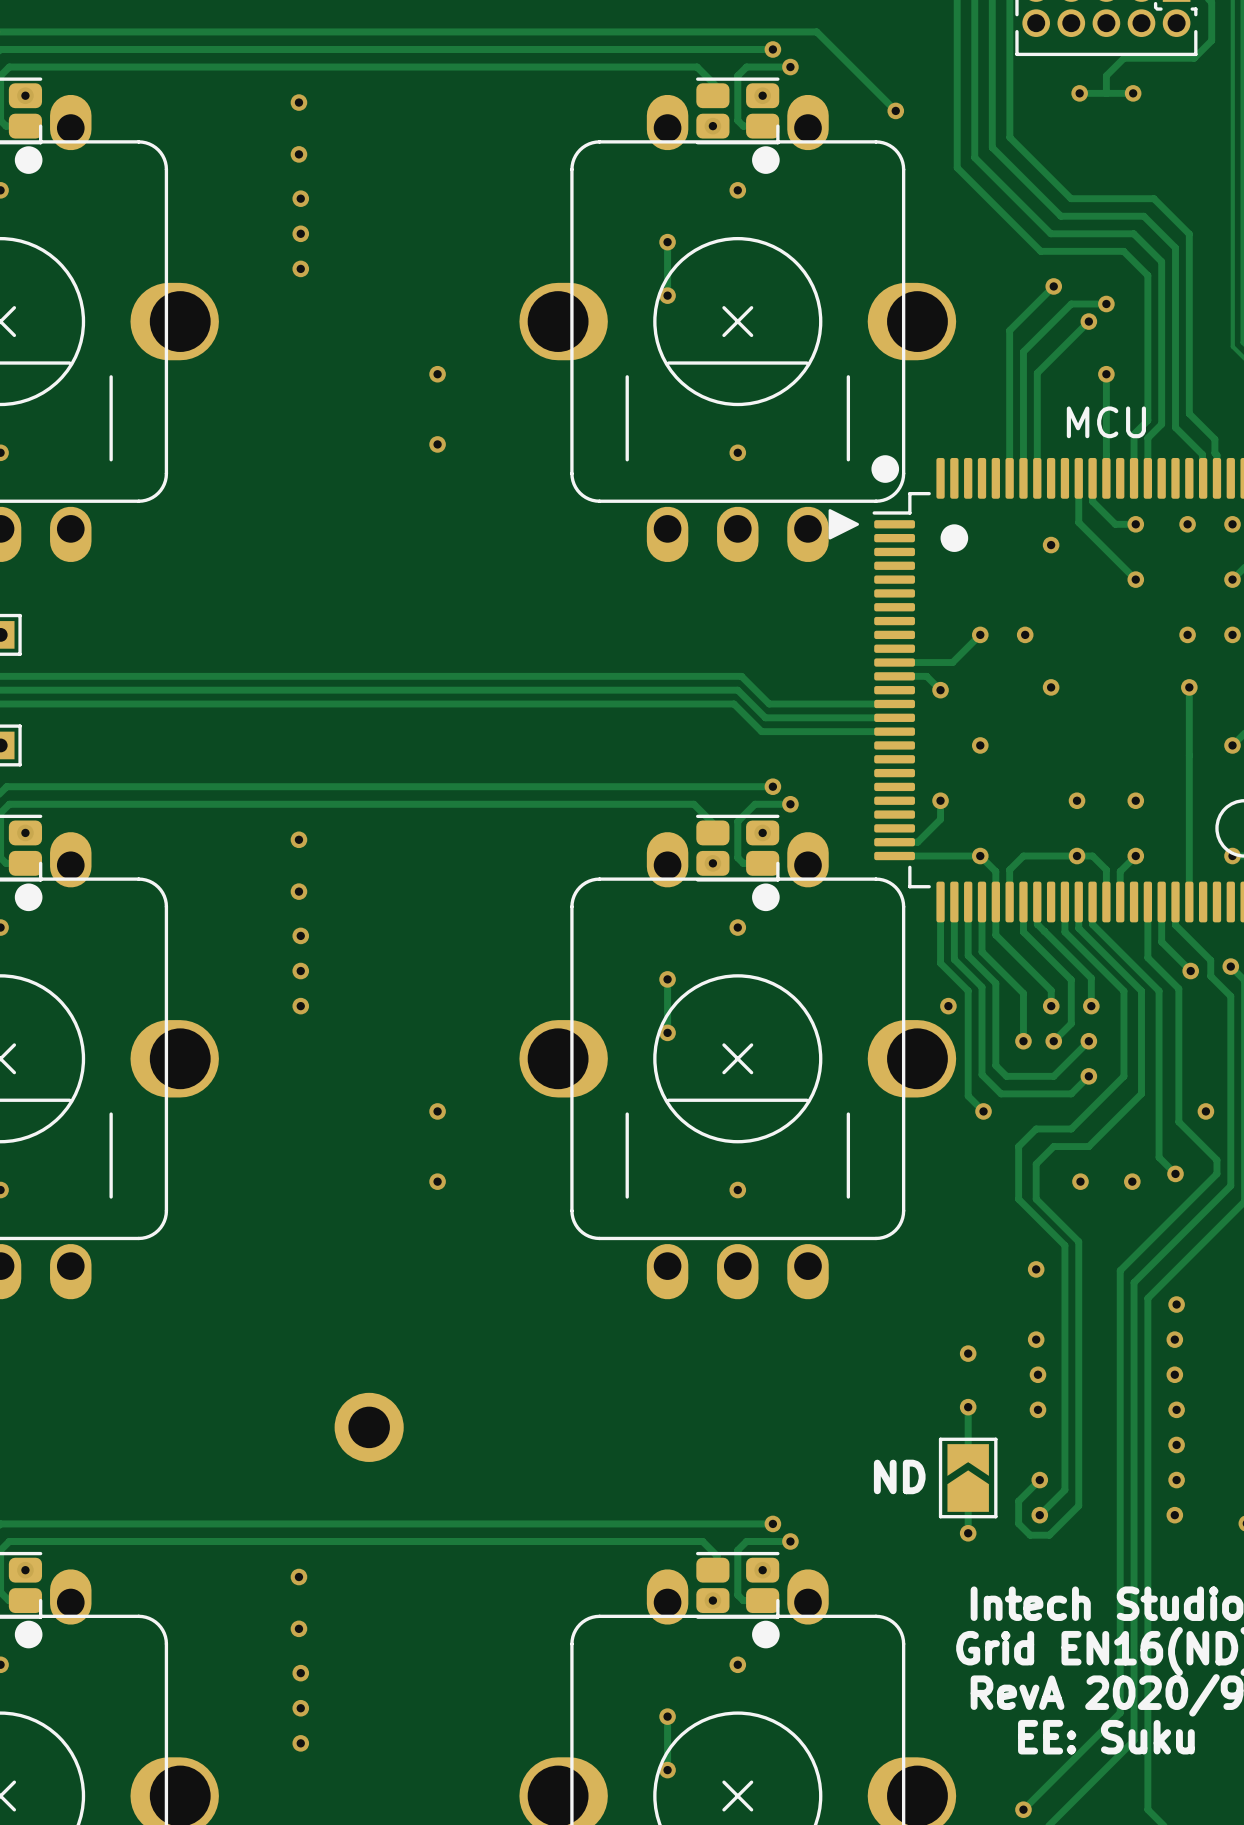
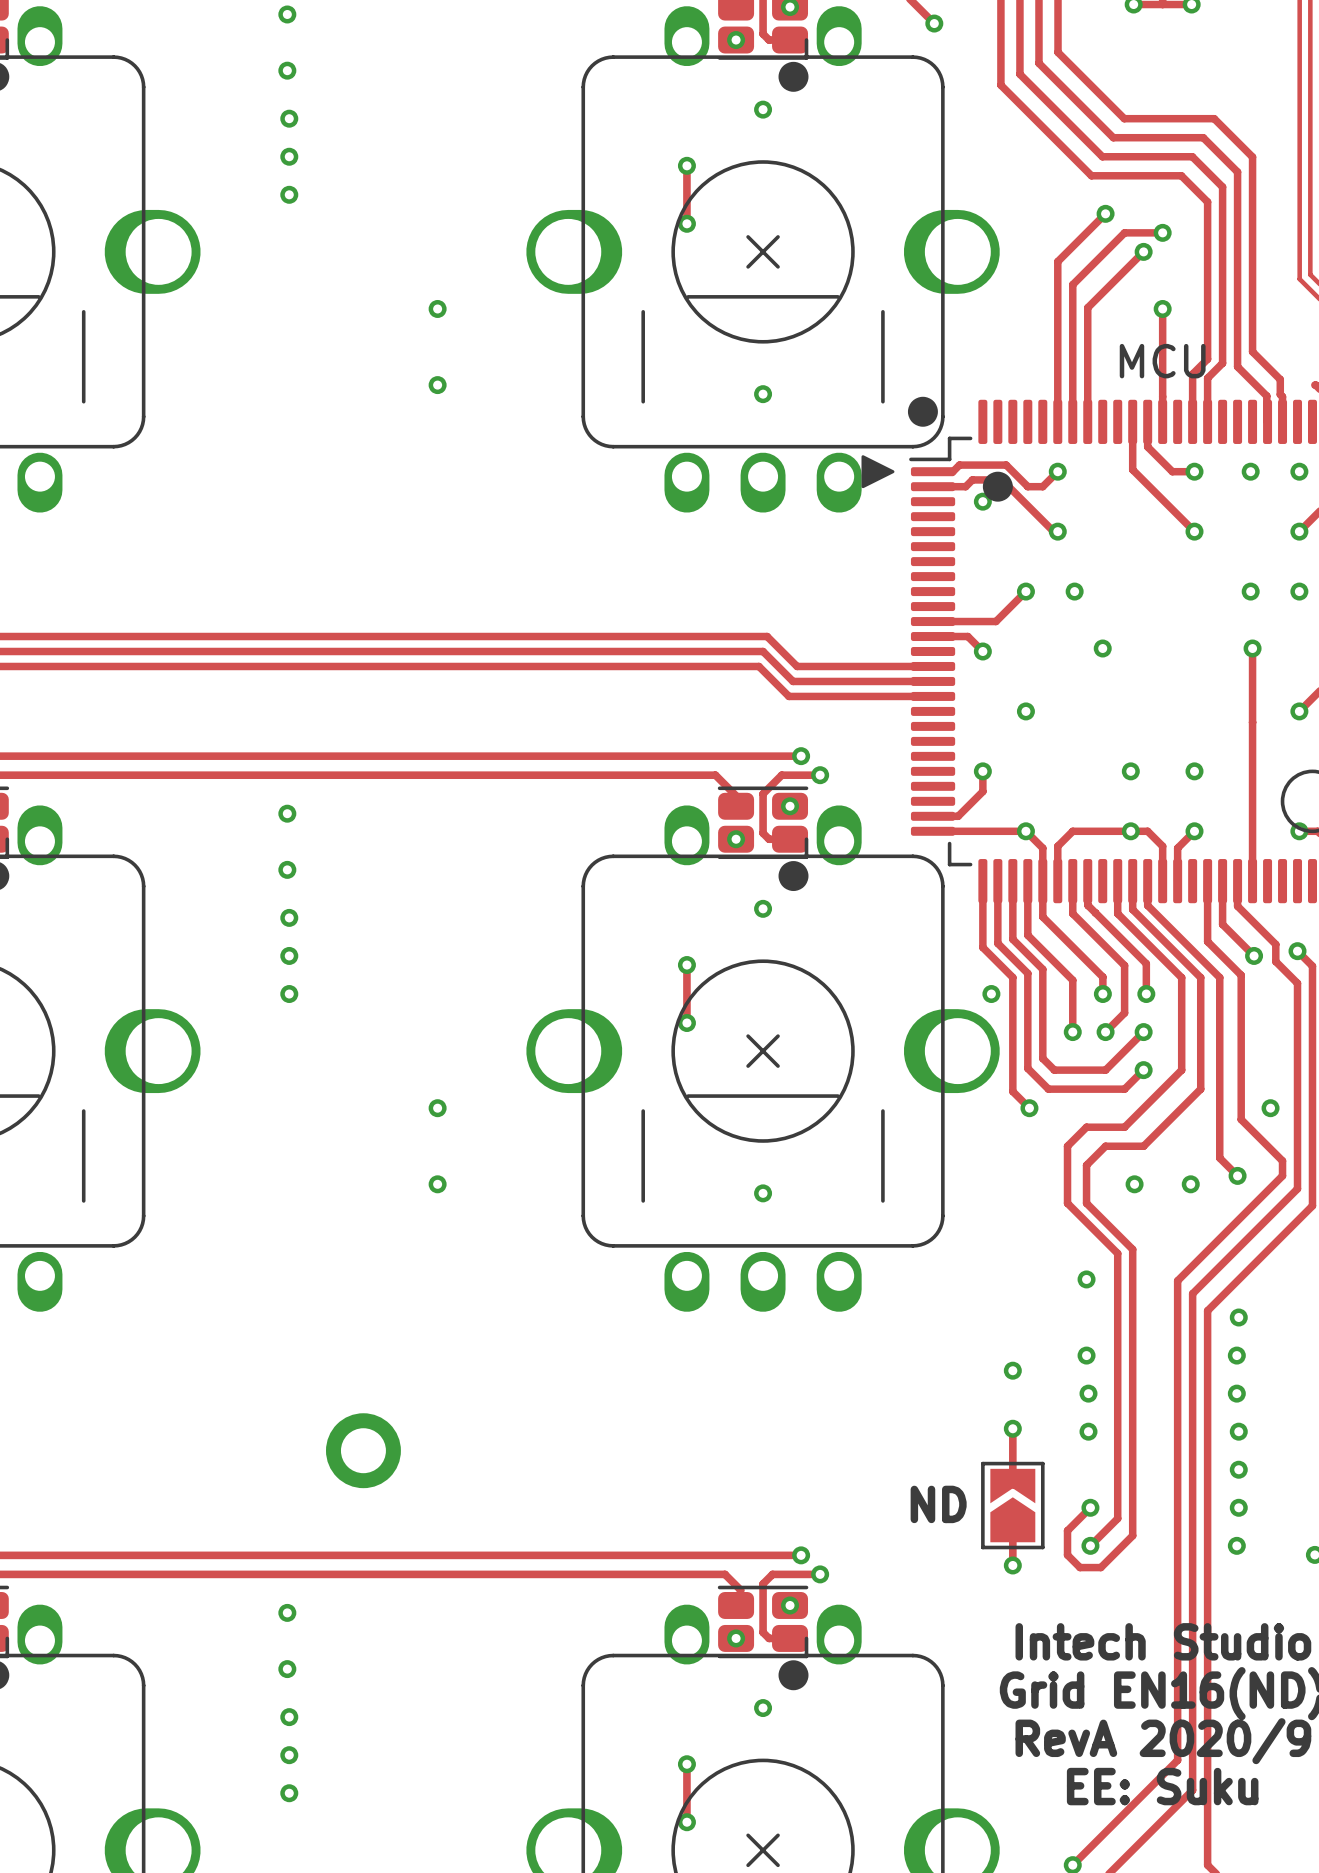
track: none -> (933, 471) (952, 471) (959, 465) (1006, 465) (1027, 486) (1042, 486) (1057, 471)
via: none -> (1057, 471)
track: none -> (933, 486) (965, 486) (972, 479) (1002, 479) (1053, 531) (1057, 531)
via: (1051, 545) -> none
via: none -> (982, 501)
via: none -> (1057, 531)

